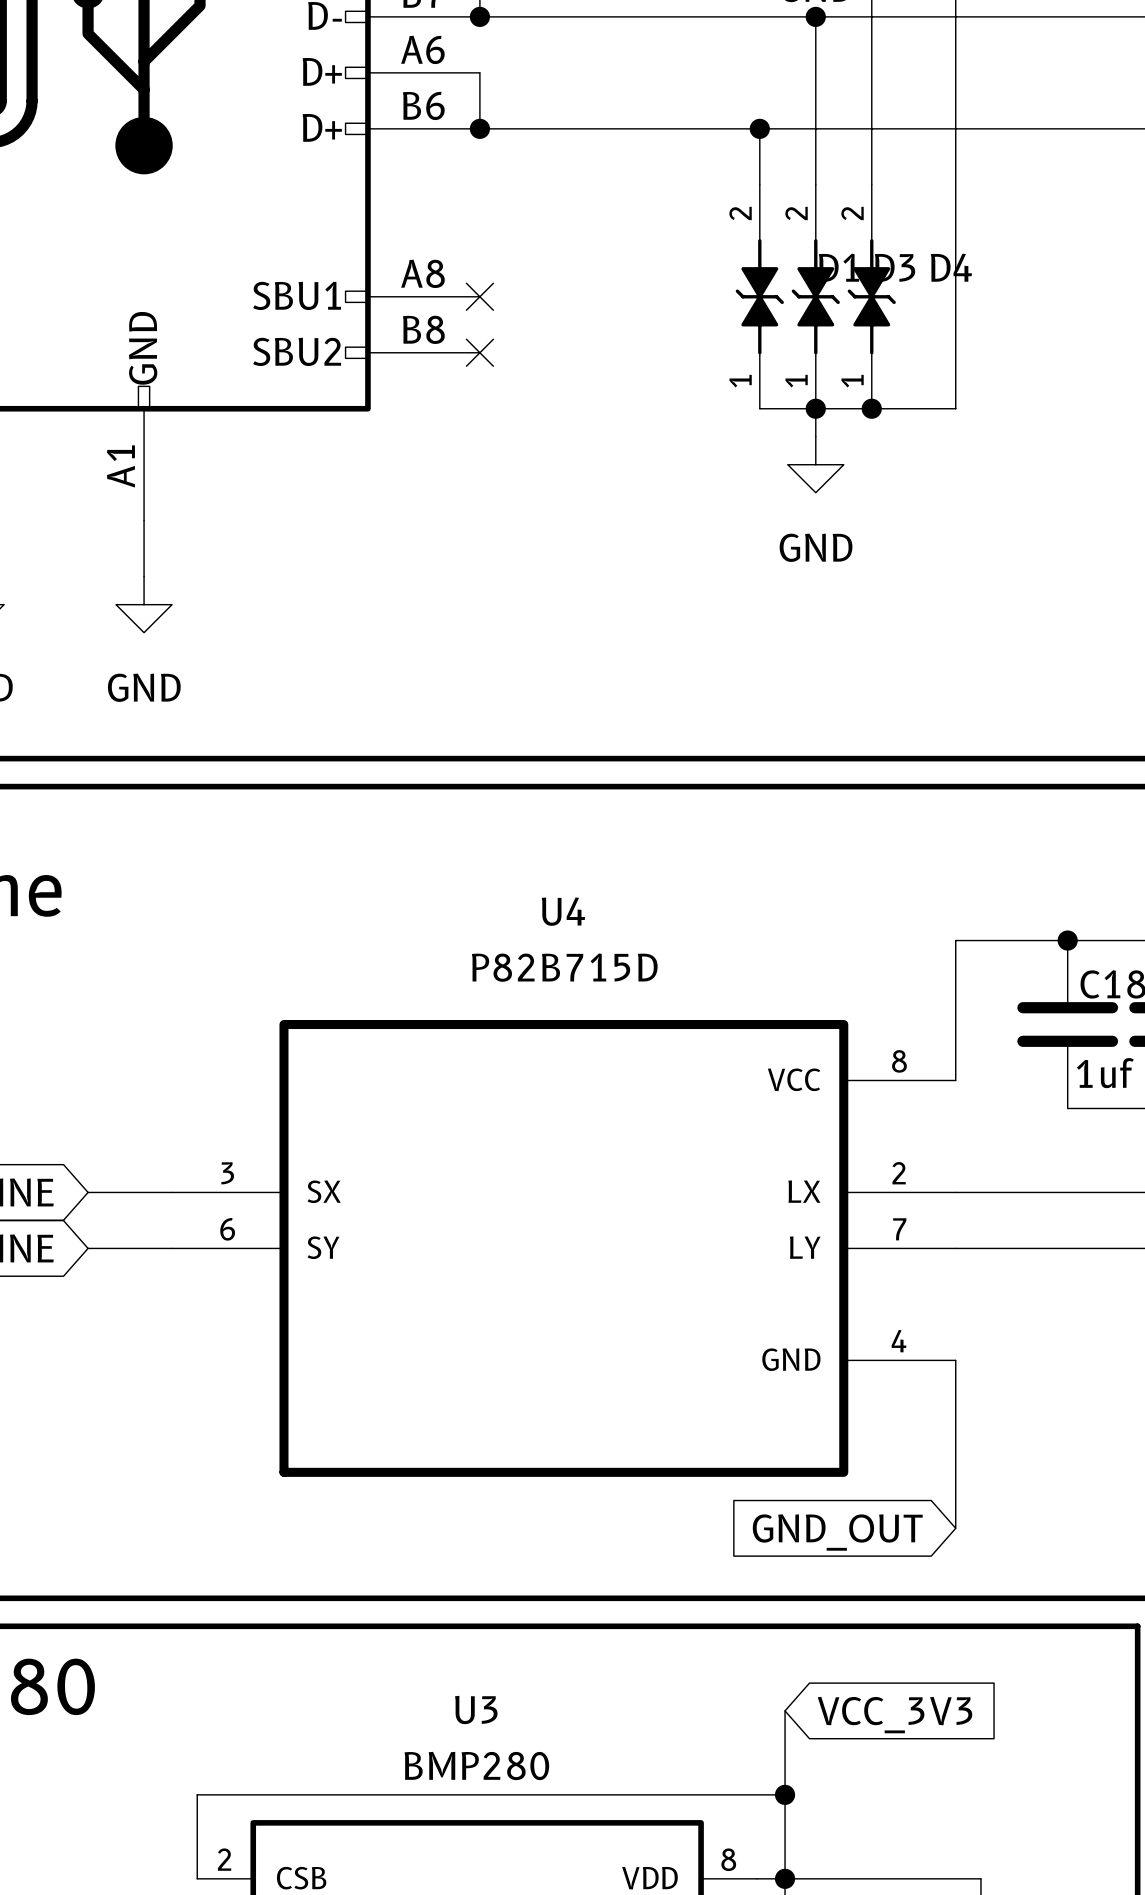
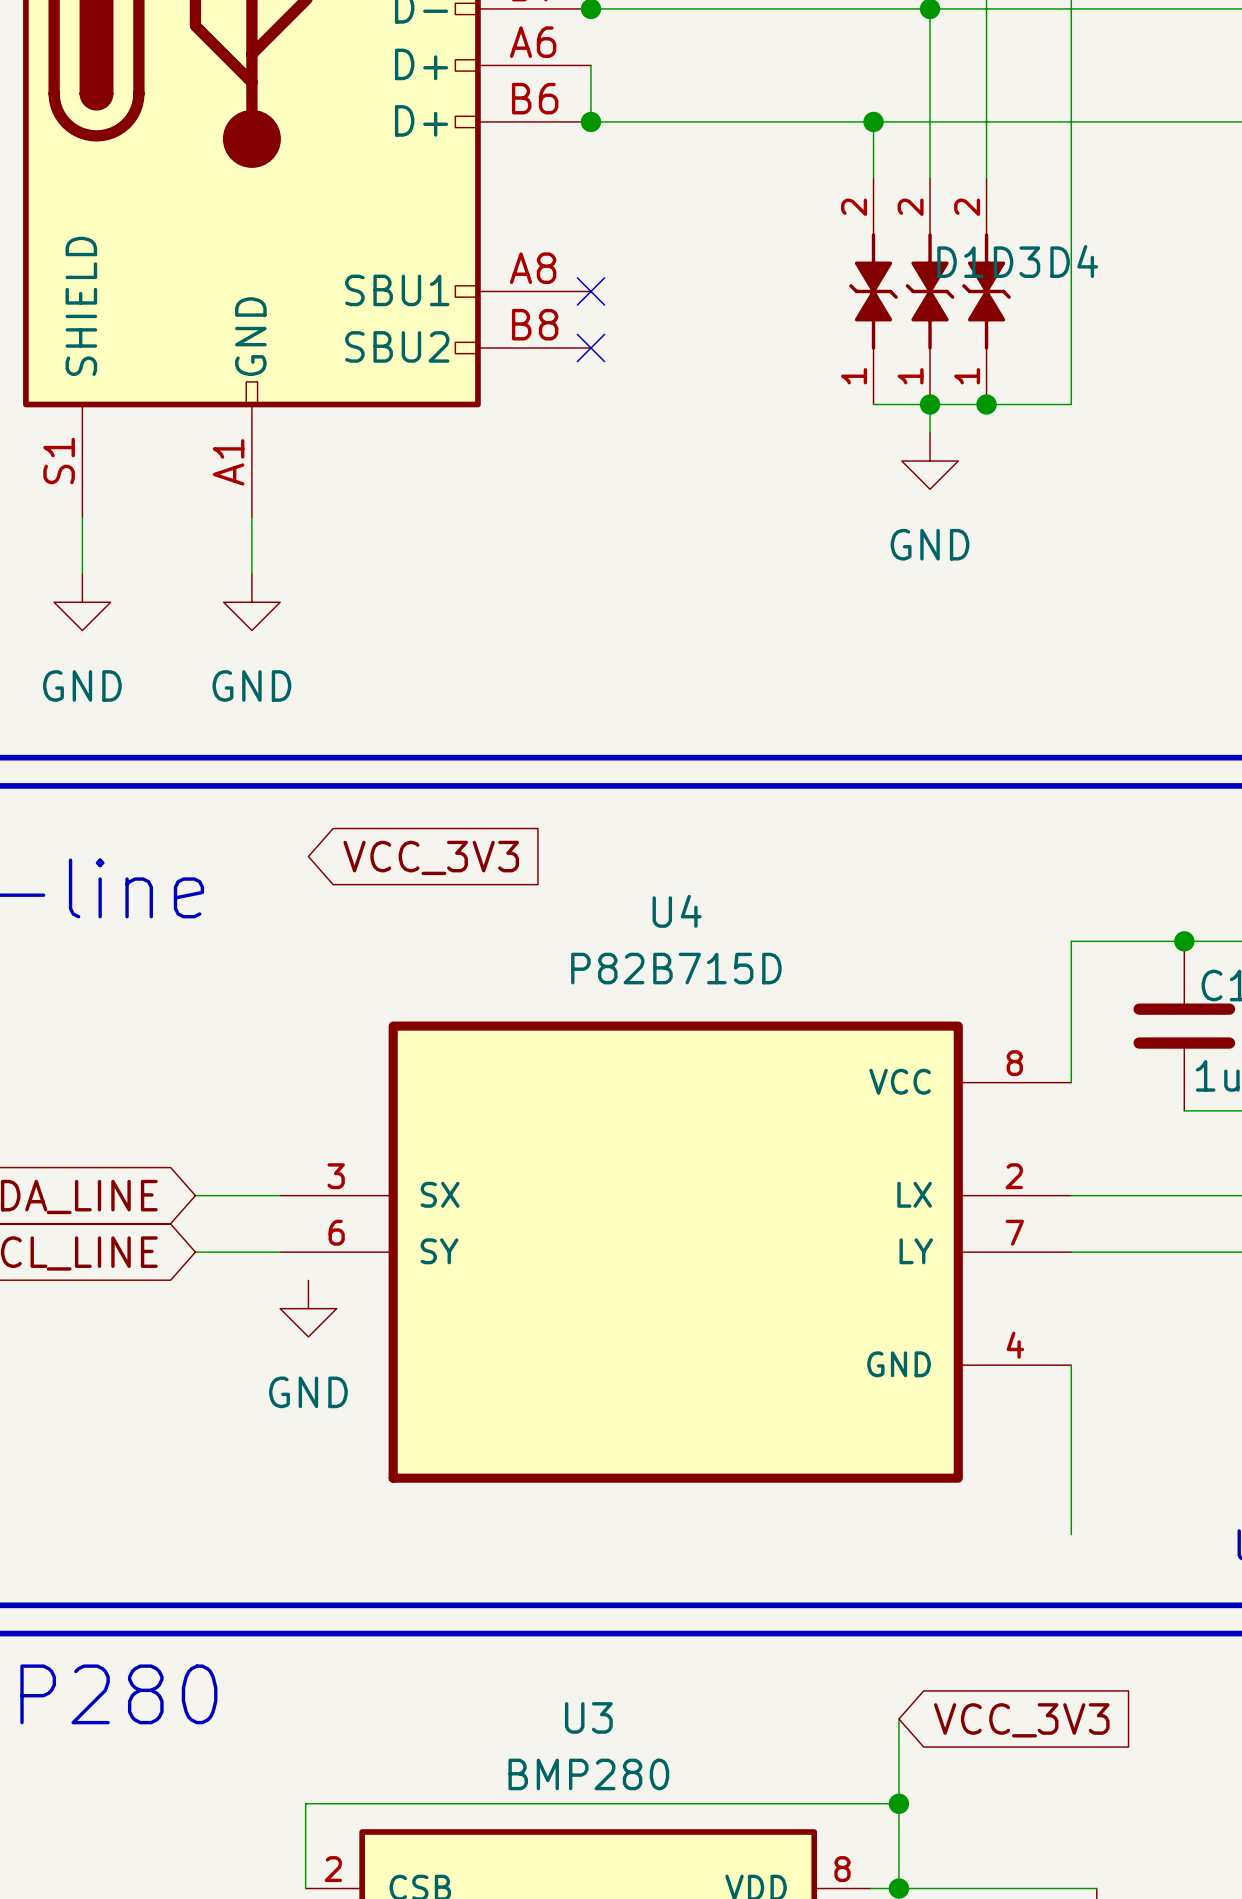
global label: none -> VCC_3V3 (431, 857)
power symbol: none -> GND (308, 1308)
global label: GND_OUT (837, 1532) -> none

